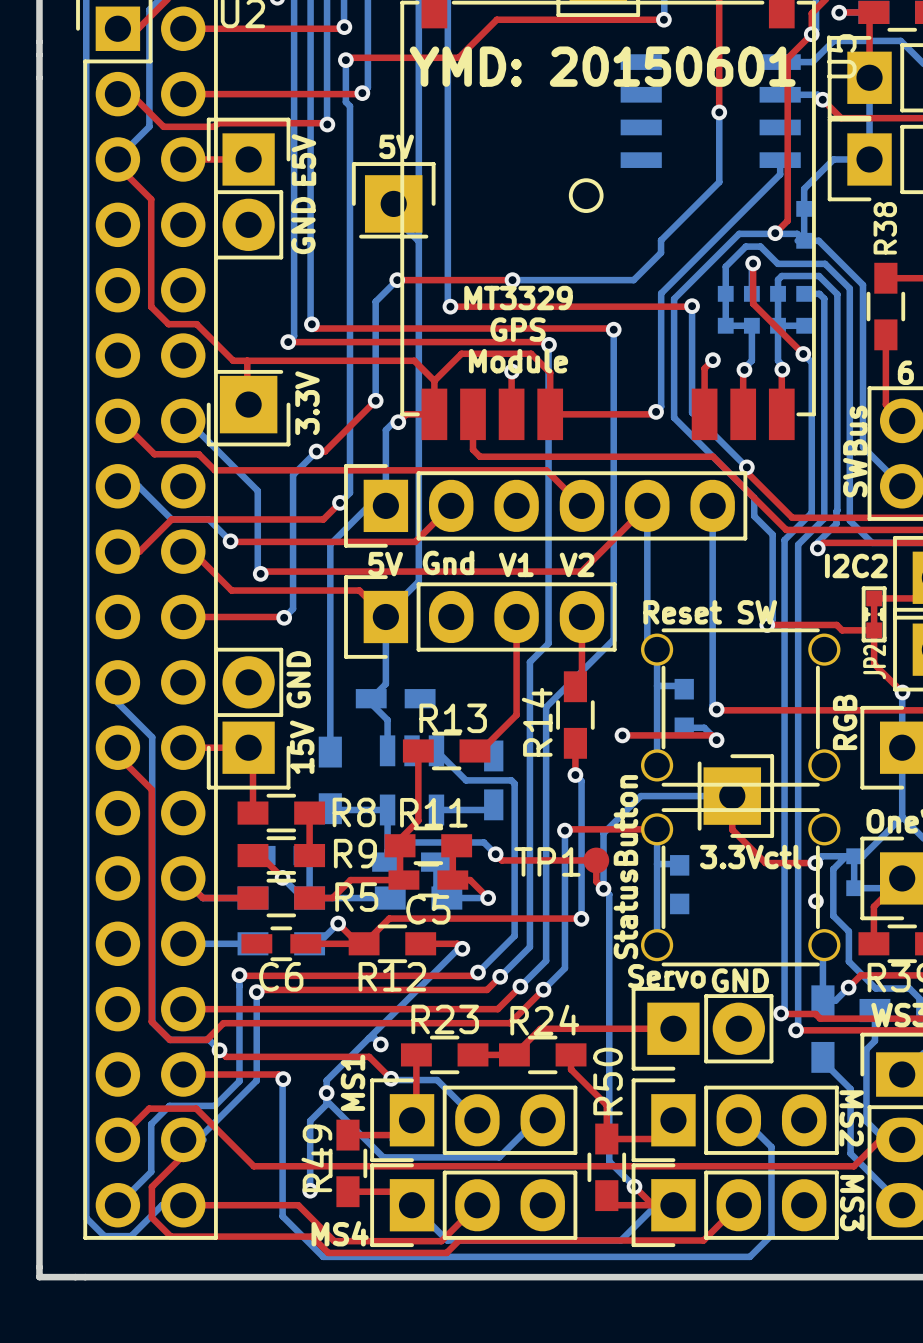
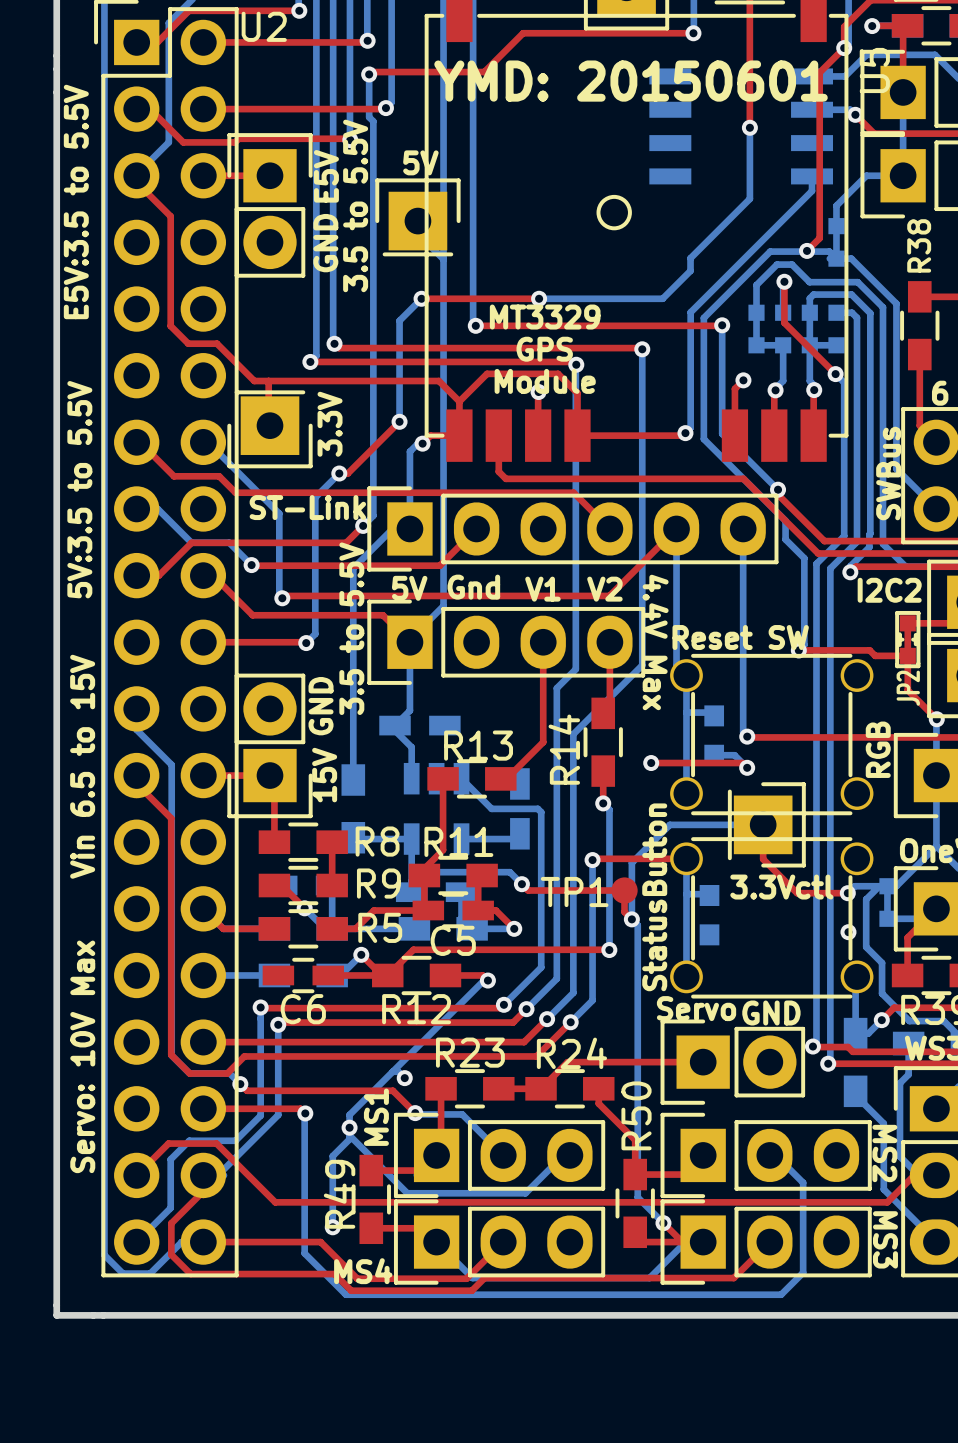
text: none -> E5V:3.5 to 5.5V (76, 201)
text: none -> 3.5 to 5.5V (355, 205)
text: none -> 5V:3.5 to 5.5V (79, 489)
text: none -> ST-Link (307, 507)
text: none -> 3.5 to 5.5V (351, 628)
text: none -> 4.4V Max (655, 642)
text: none -> Vin 6.5 to 15V (82, 766)
text: none -> Servo: 10V Max (82, 1056)

